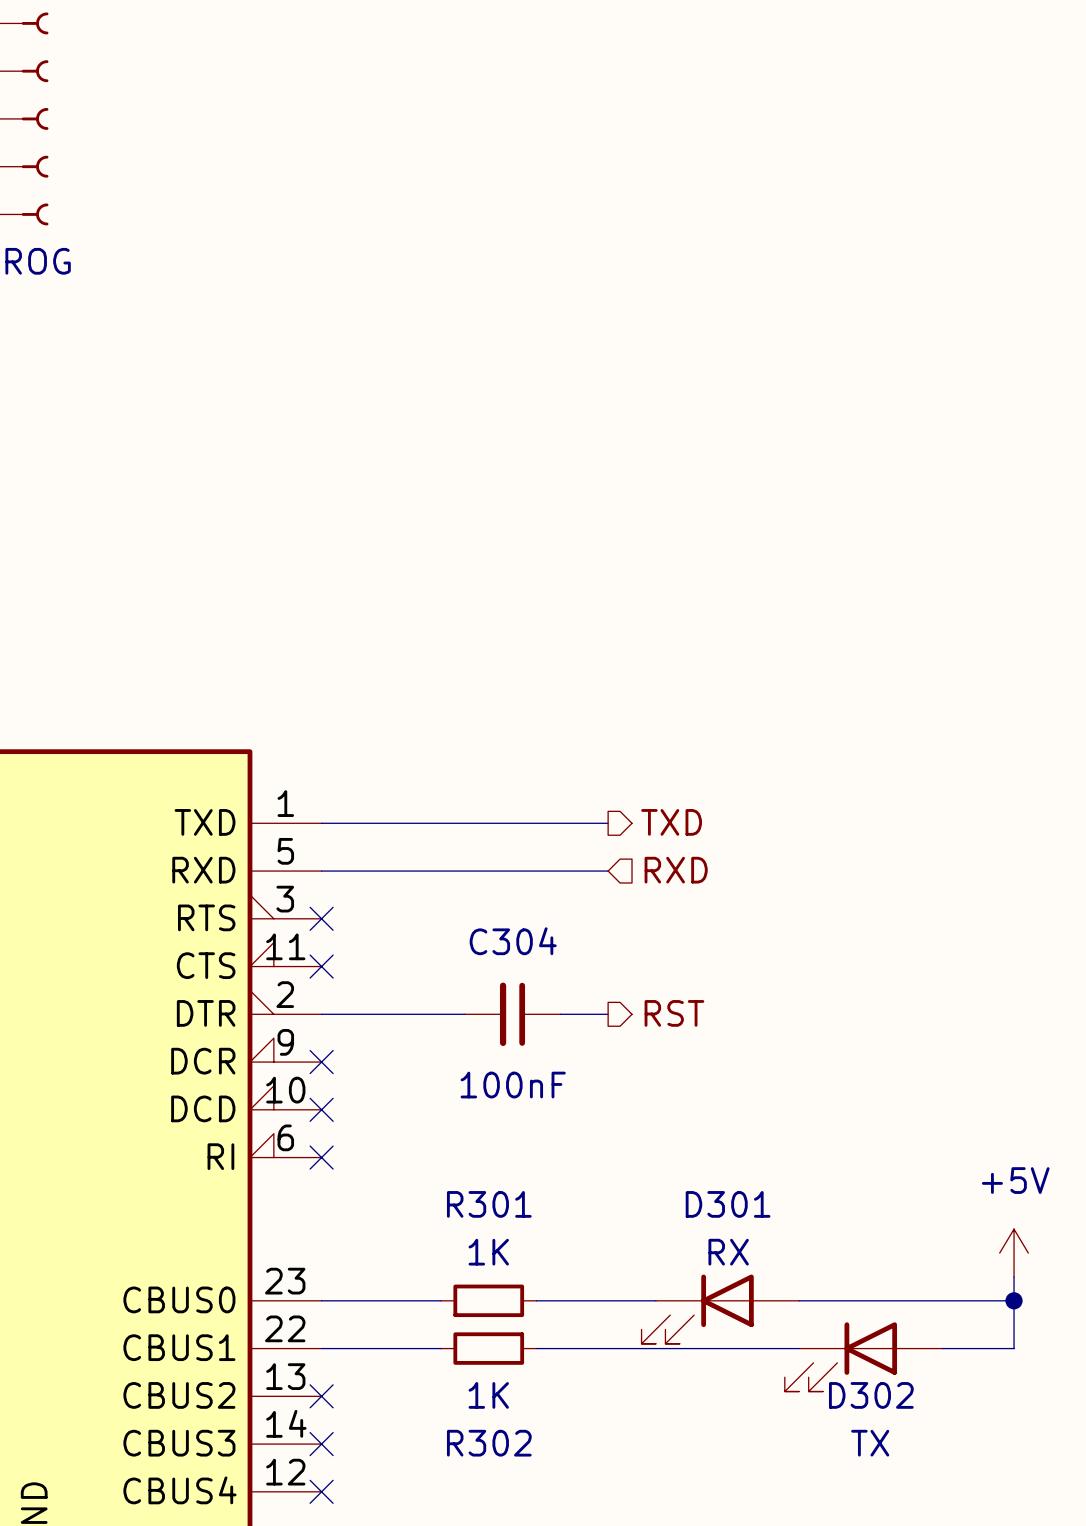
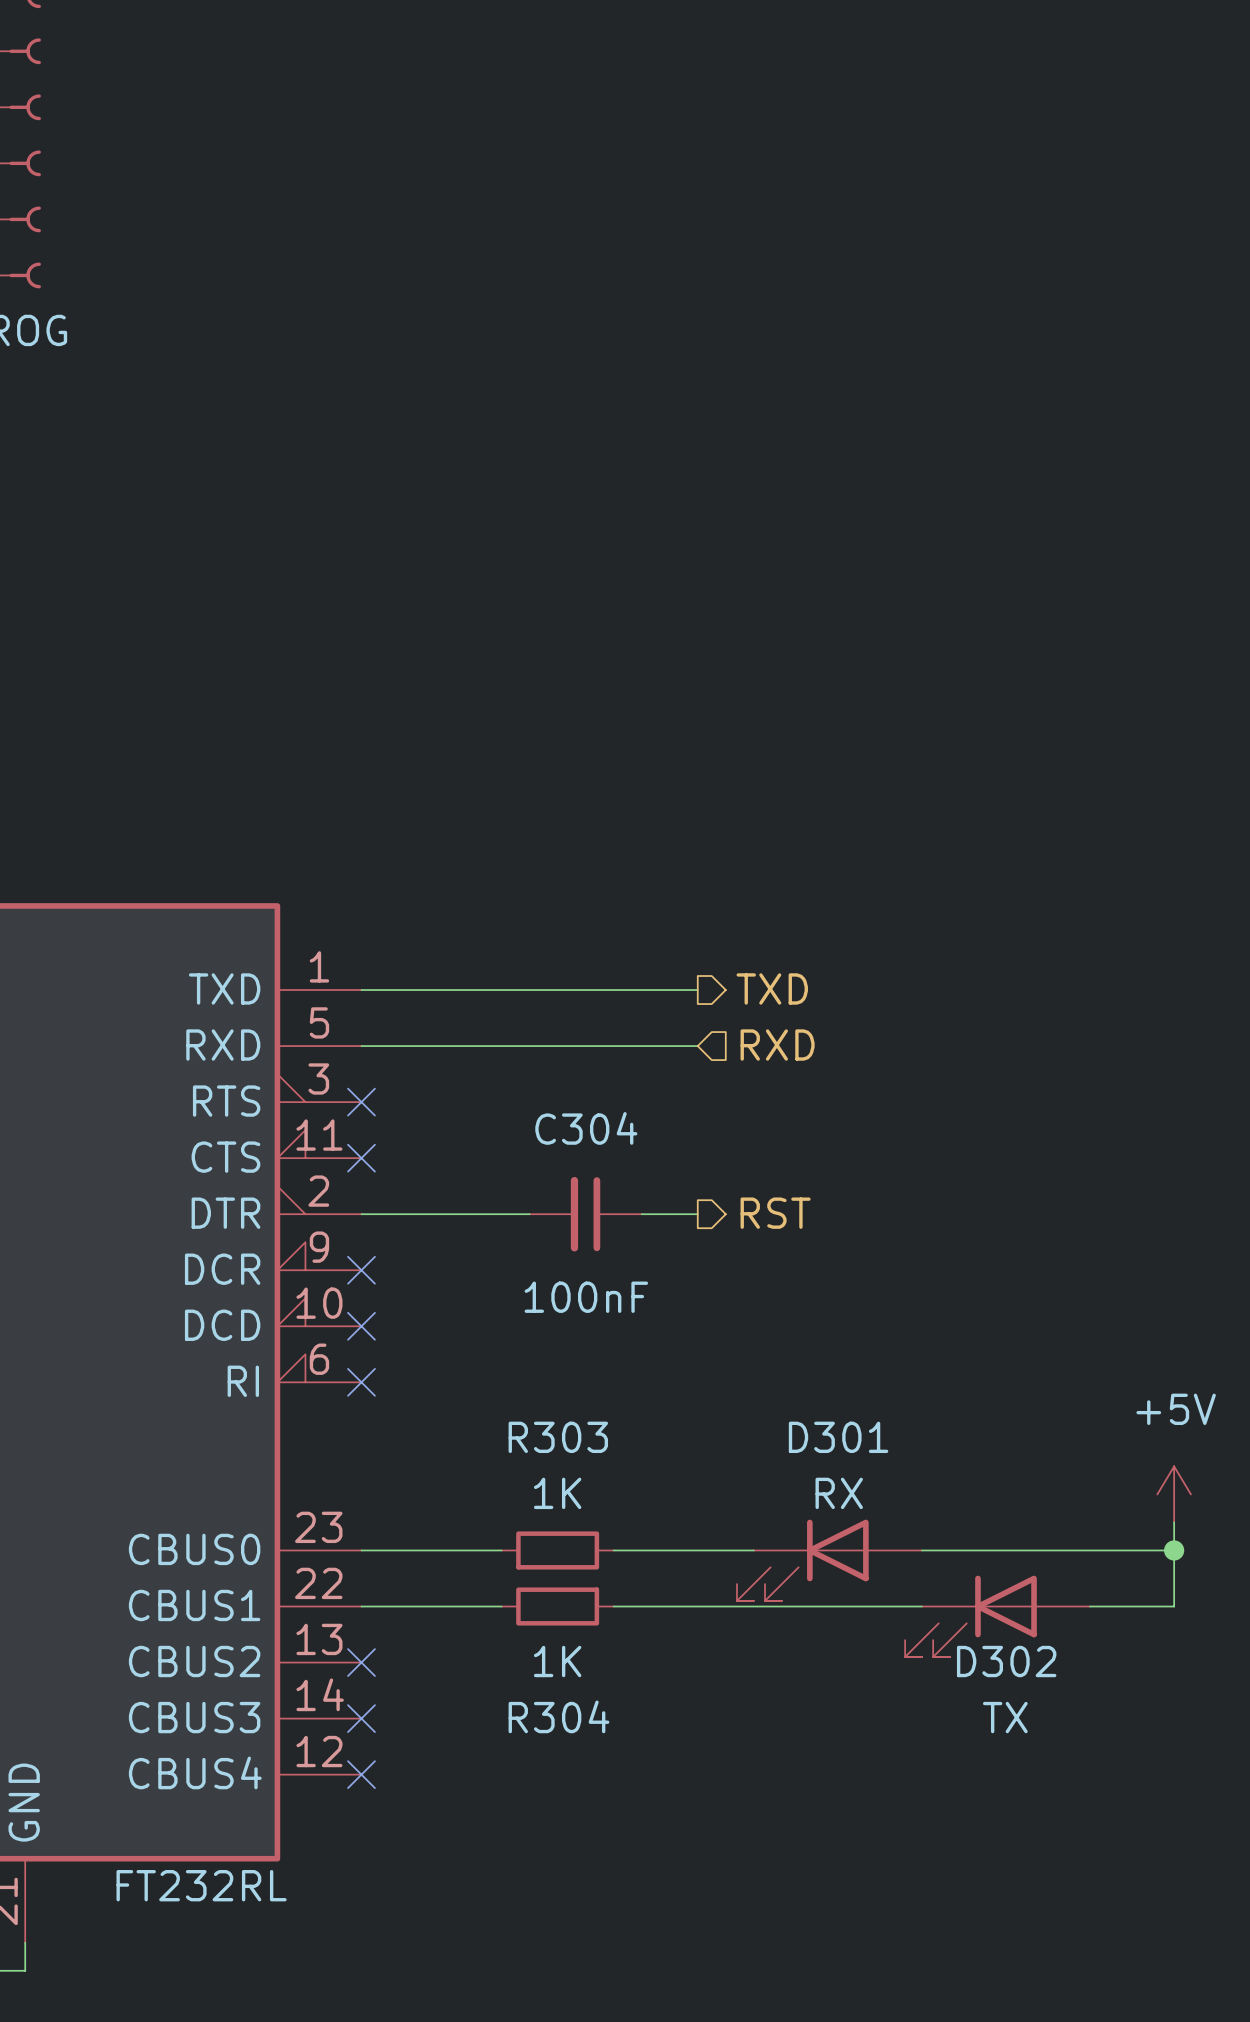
R301 name: R301 (489, 1204) -> R303 (558, 1437)
R302 name: R302 (489, 1443) -> R304 (558, 1716)

